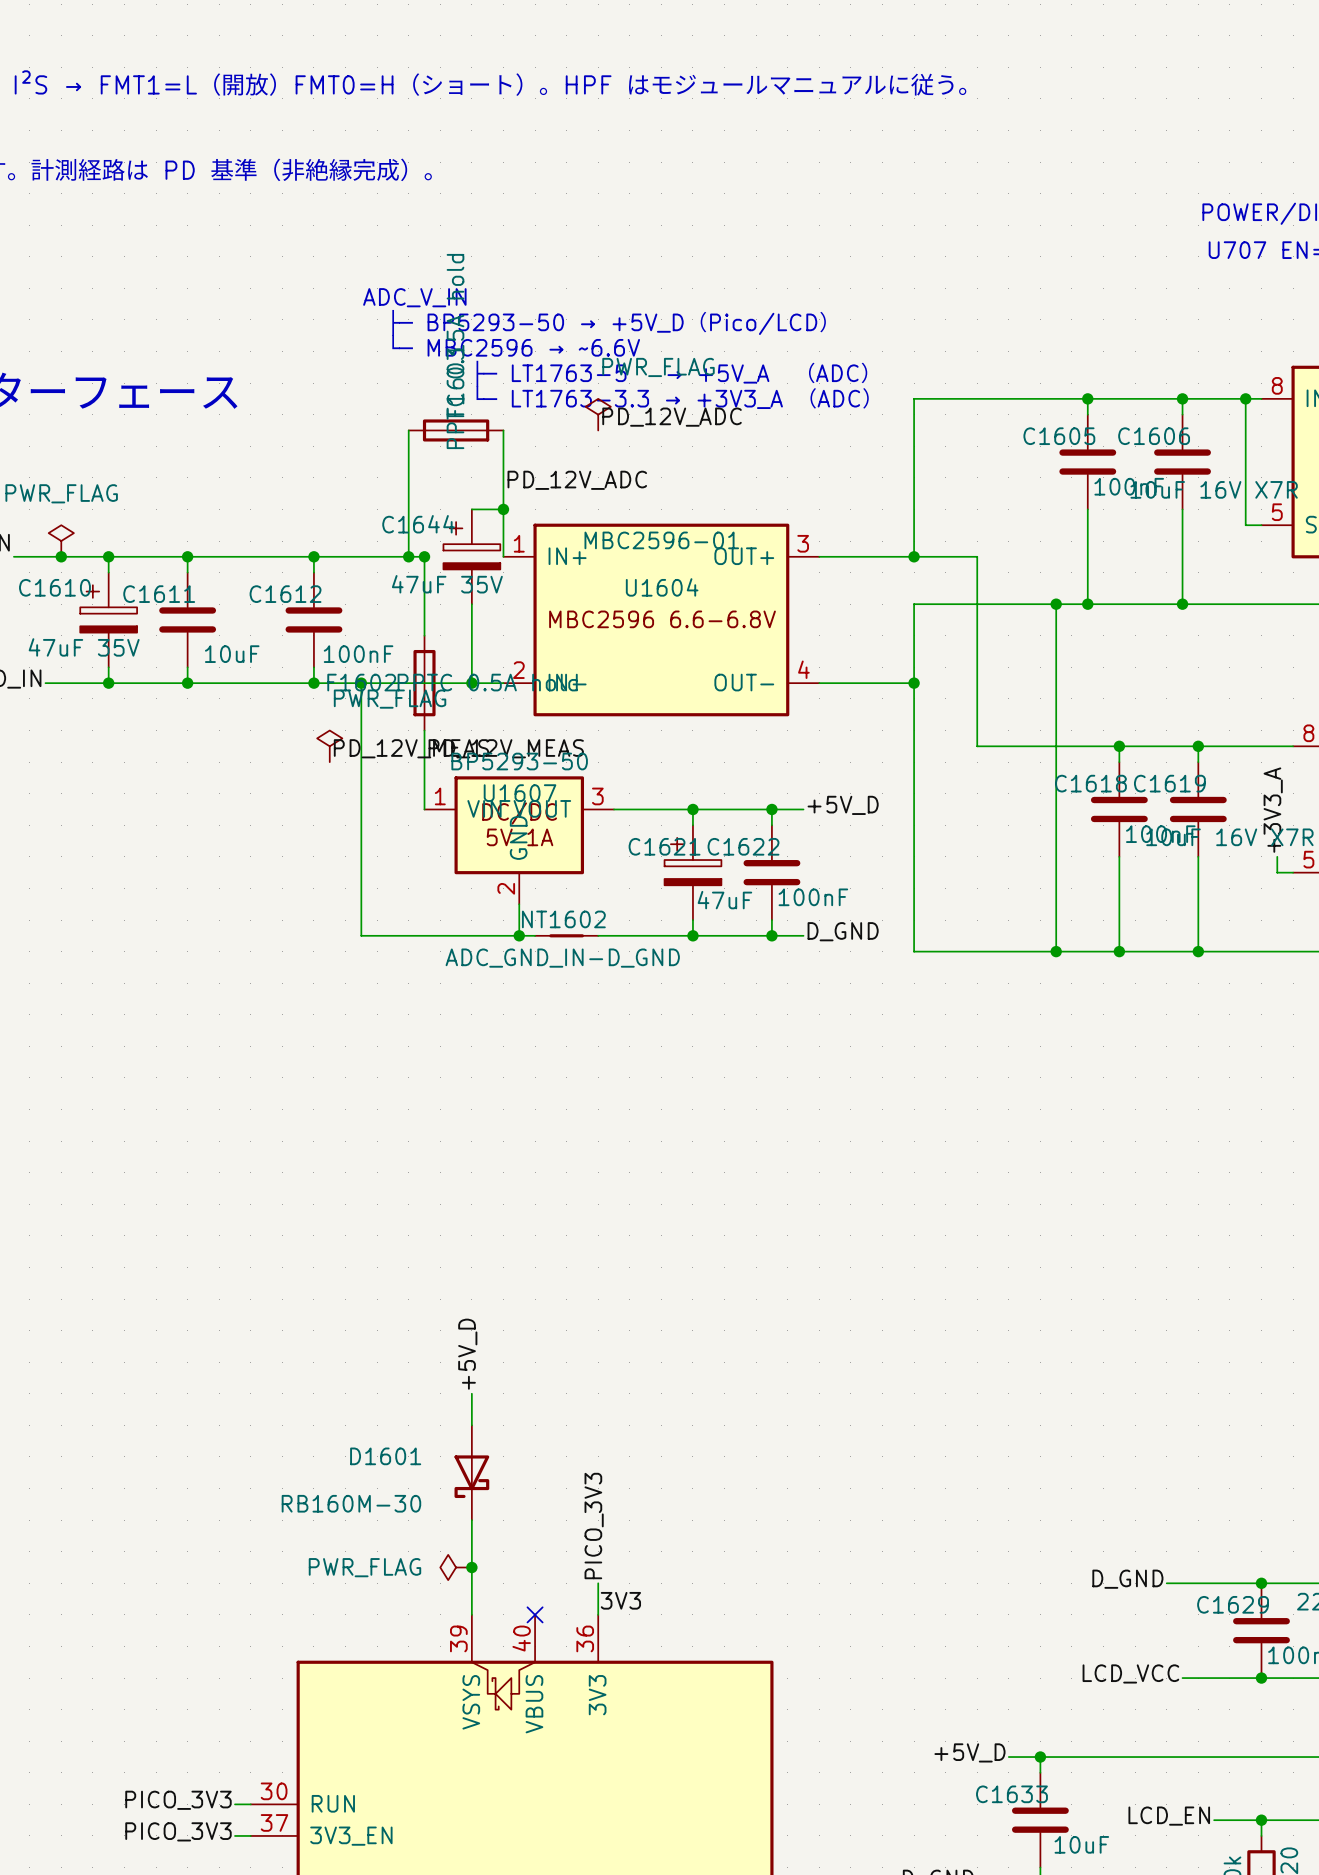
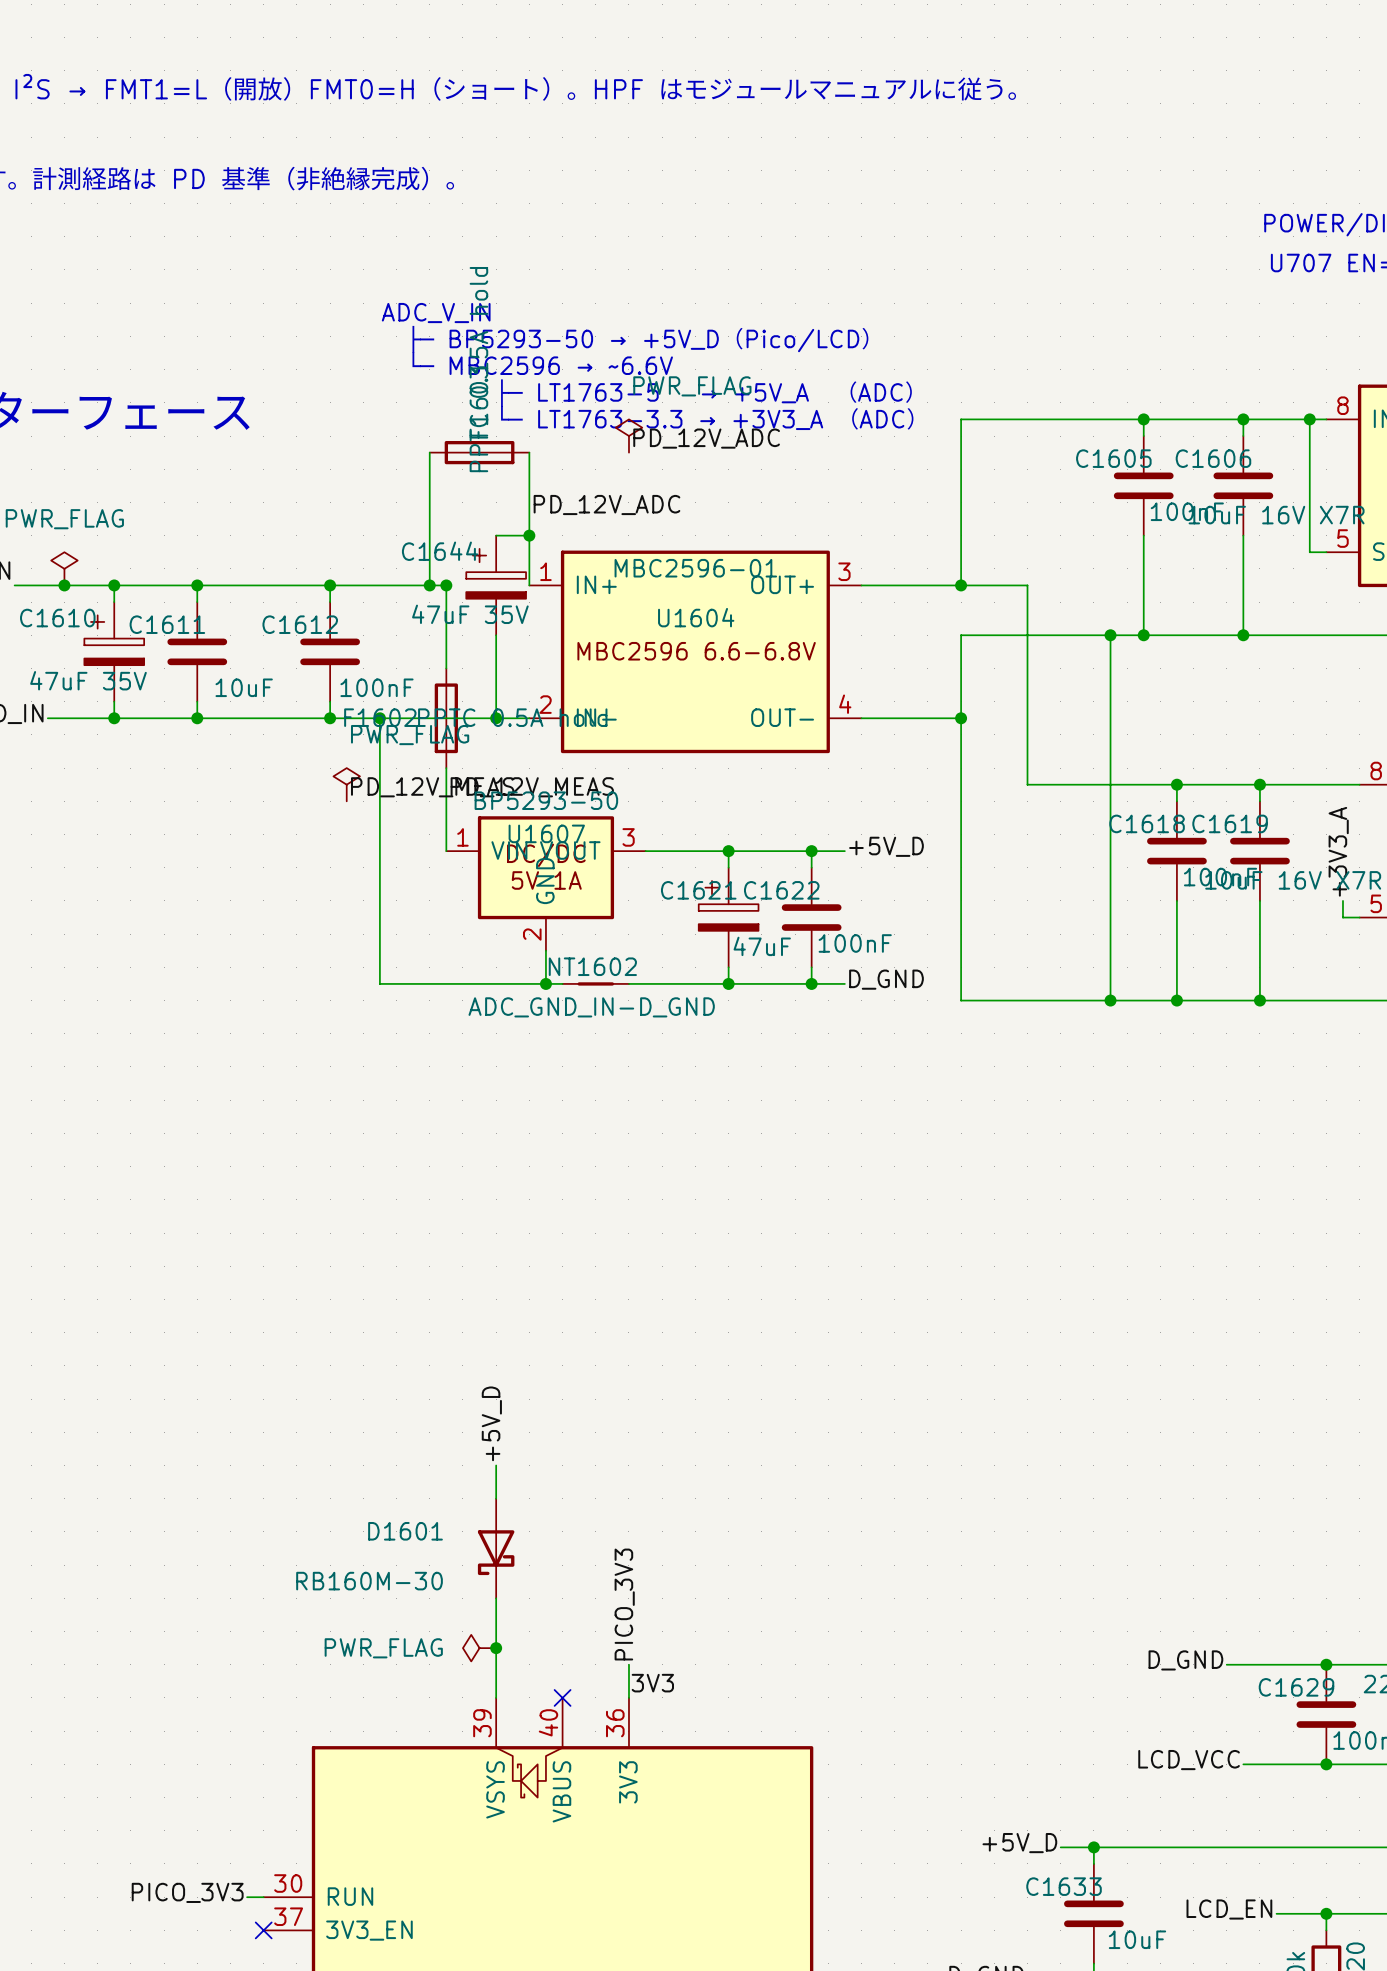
label: PICO_3V3 (178, 1831) -> none
wire: (235, 1835) (250, 1835) -> none
no-connect mark: none -> (263, 1930)

